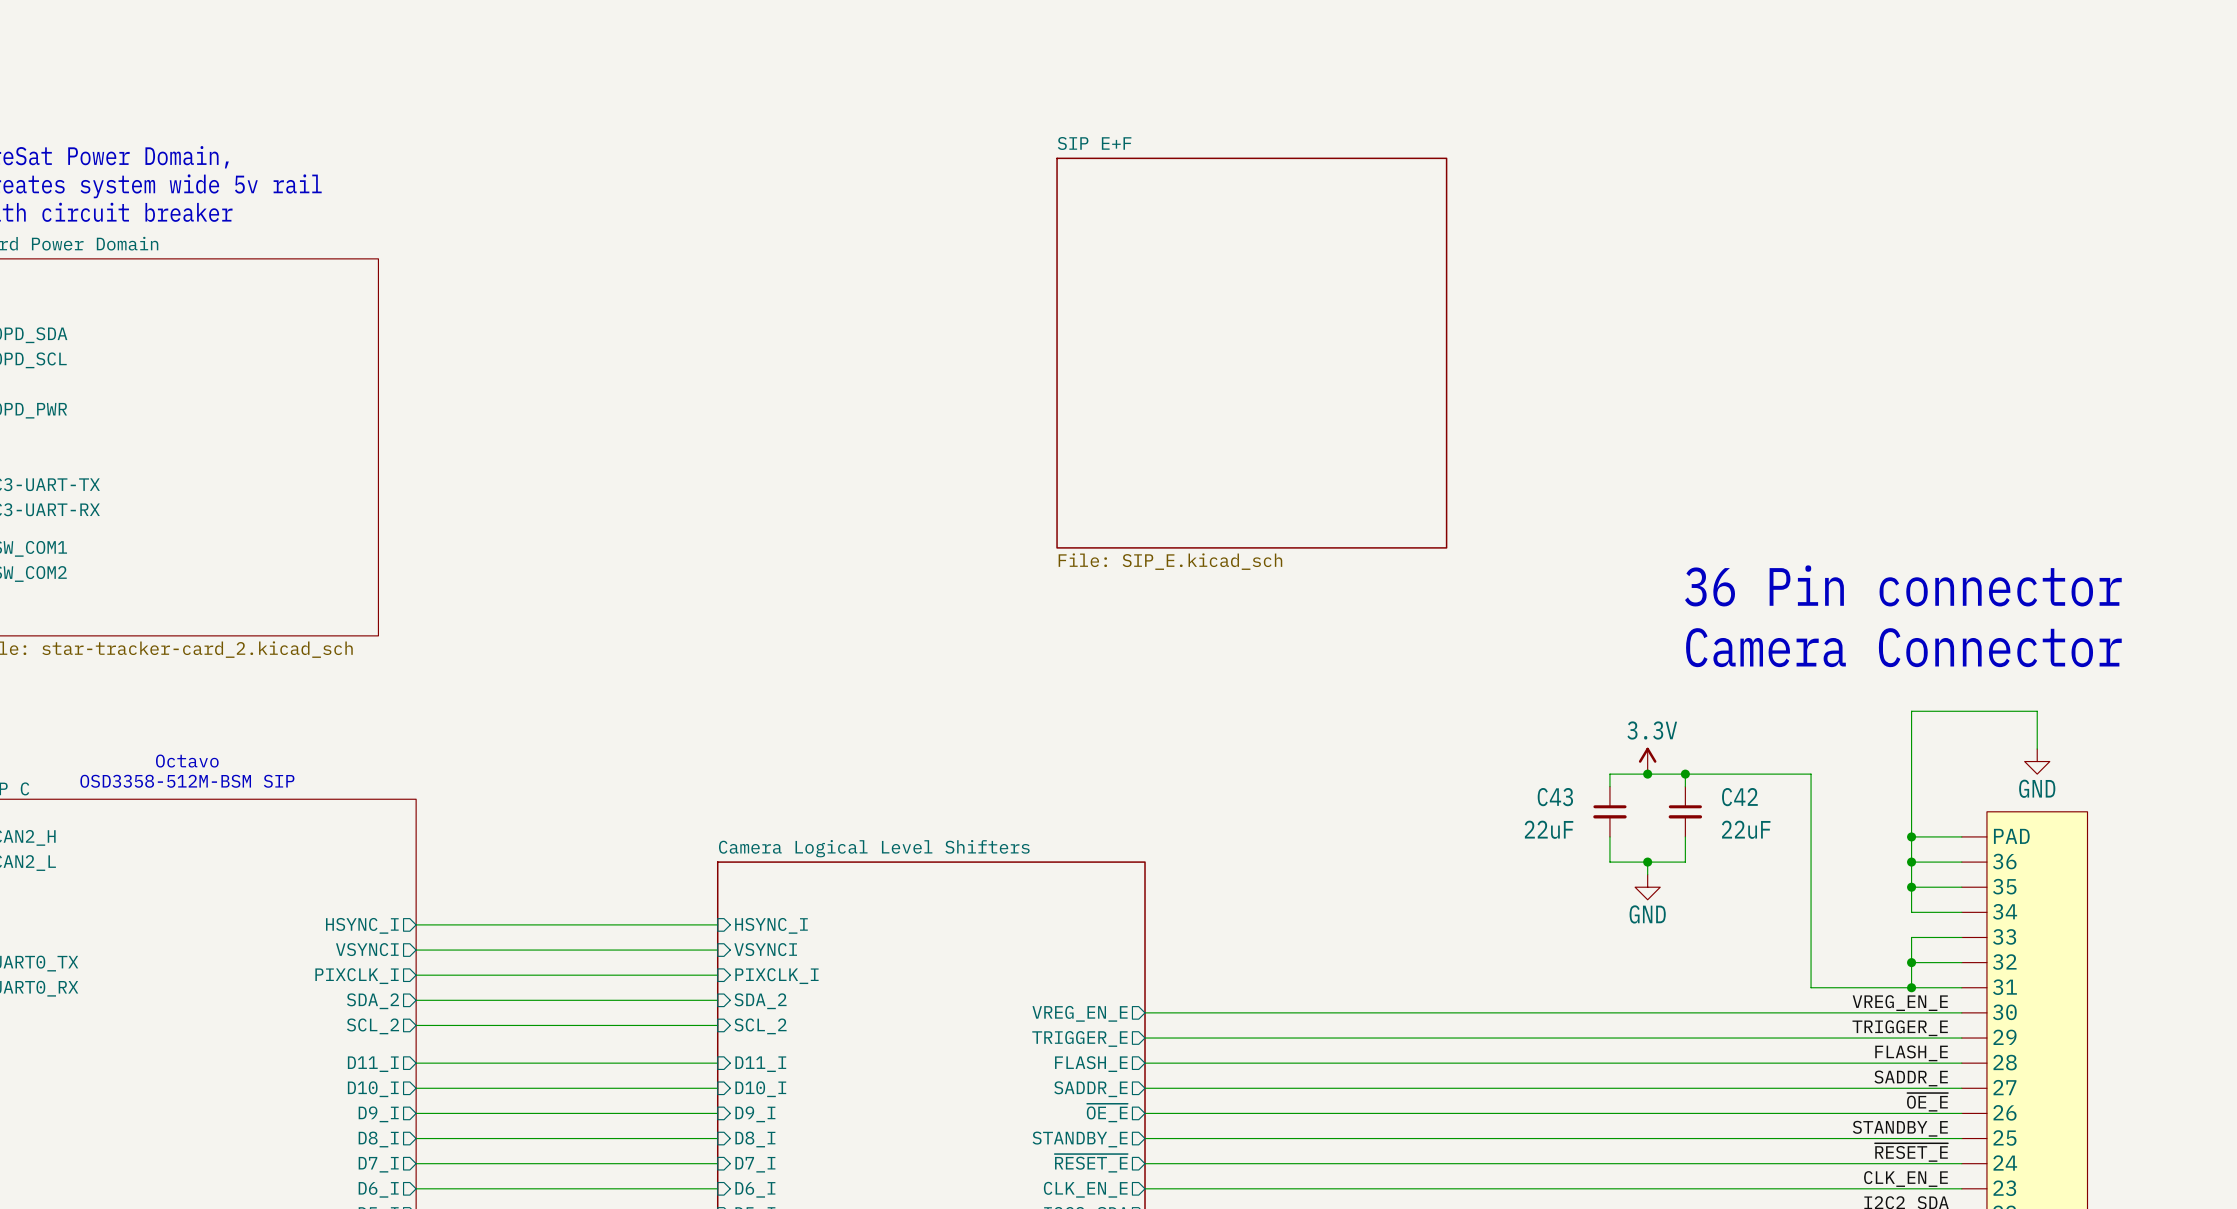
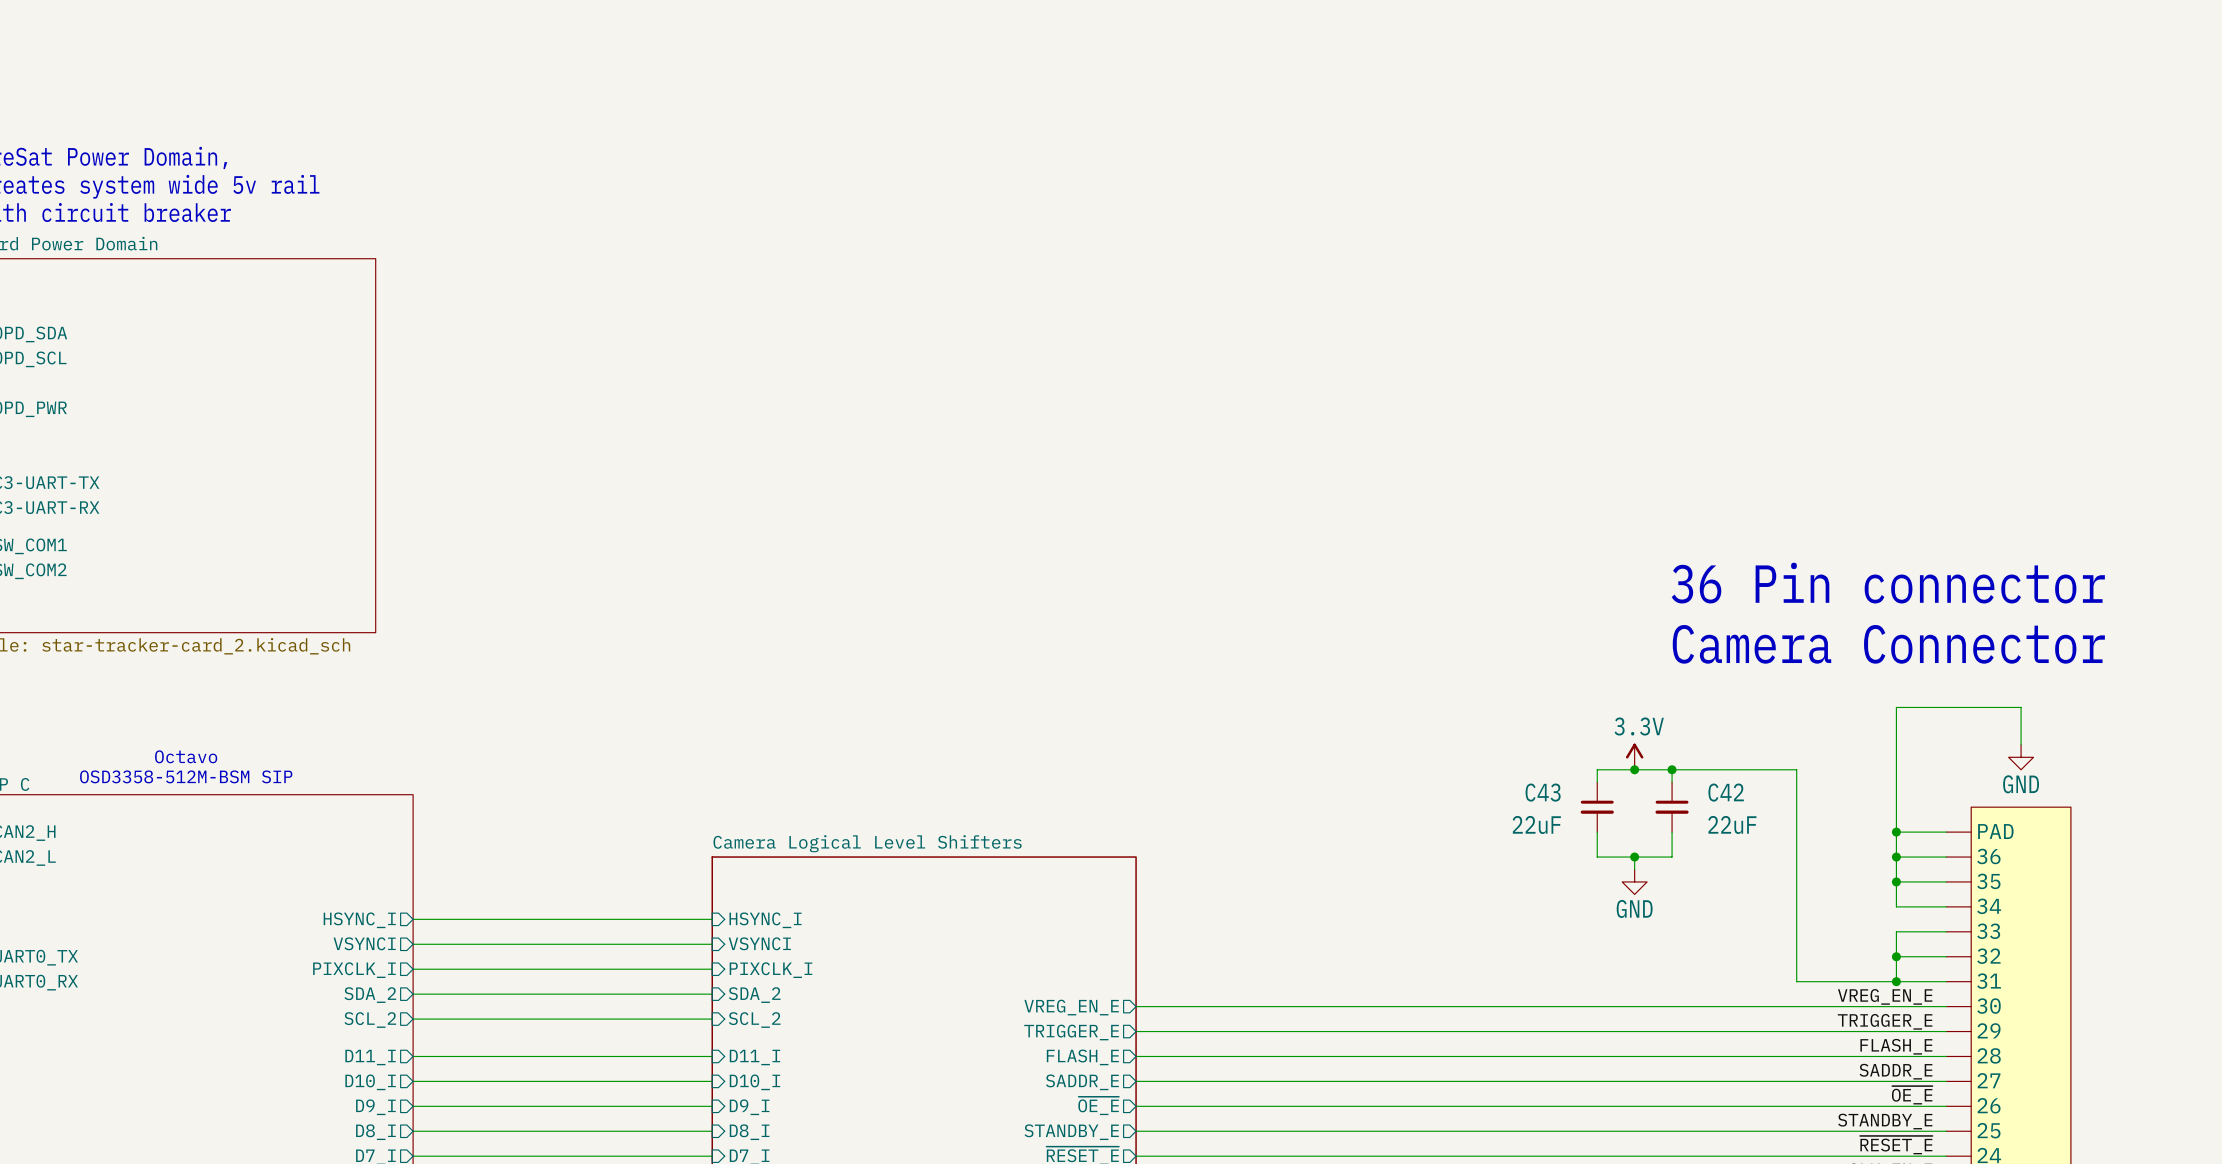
sheet SIP E+F: File: SIP_E.kicad_sch (1251, 353) -> none

